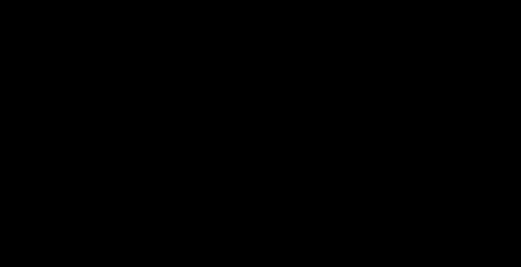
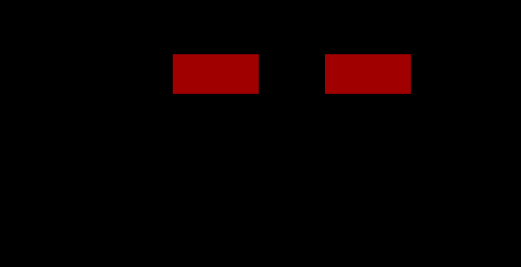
part: none -> (291, 74)

